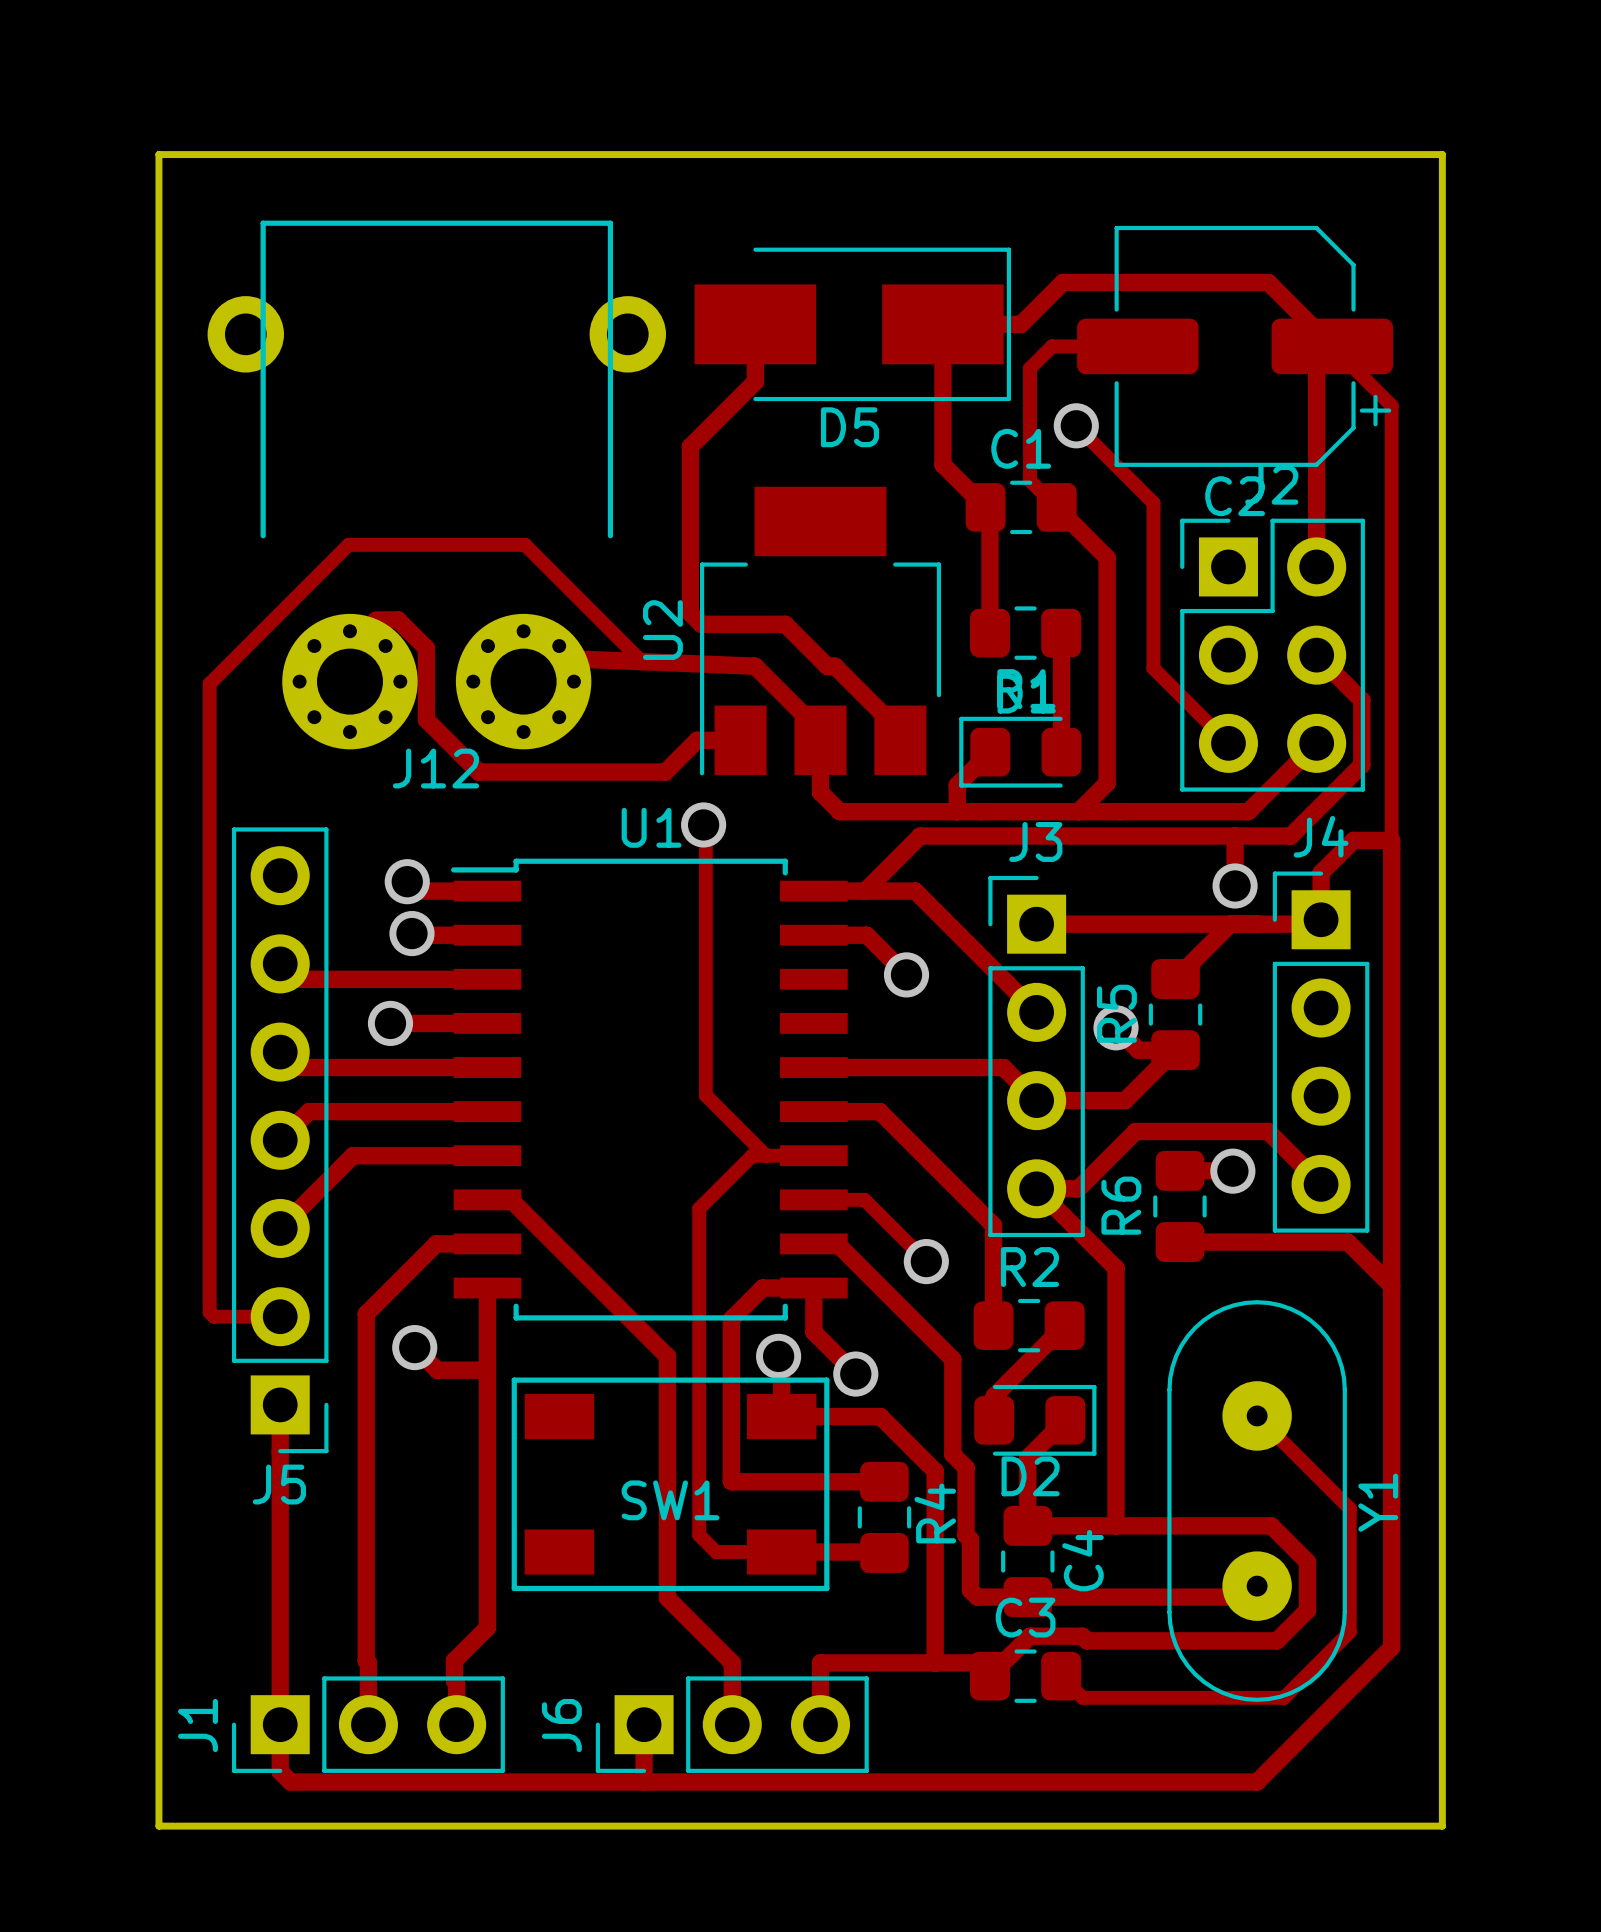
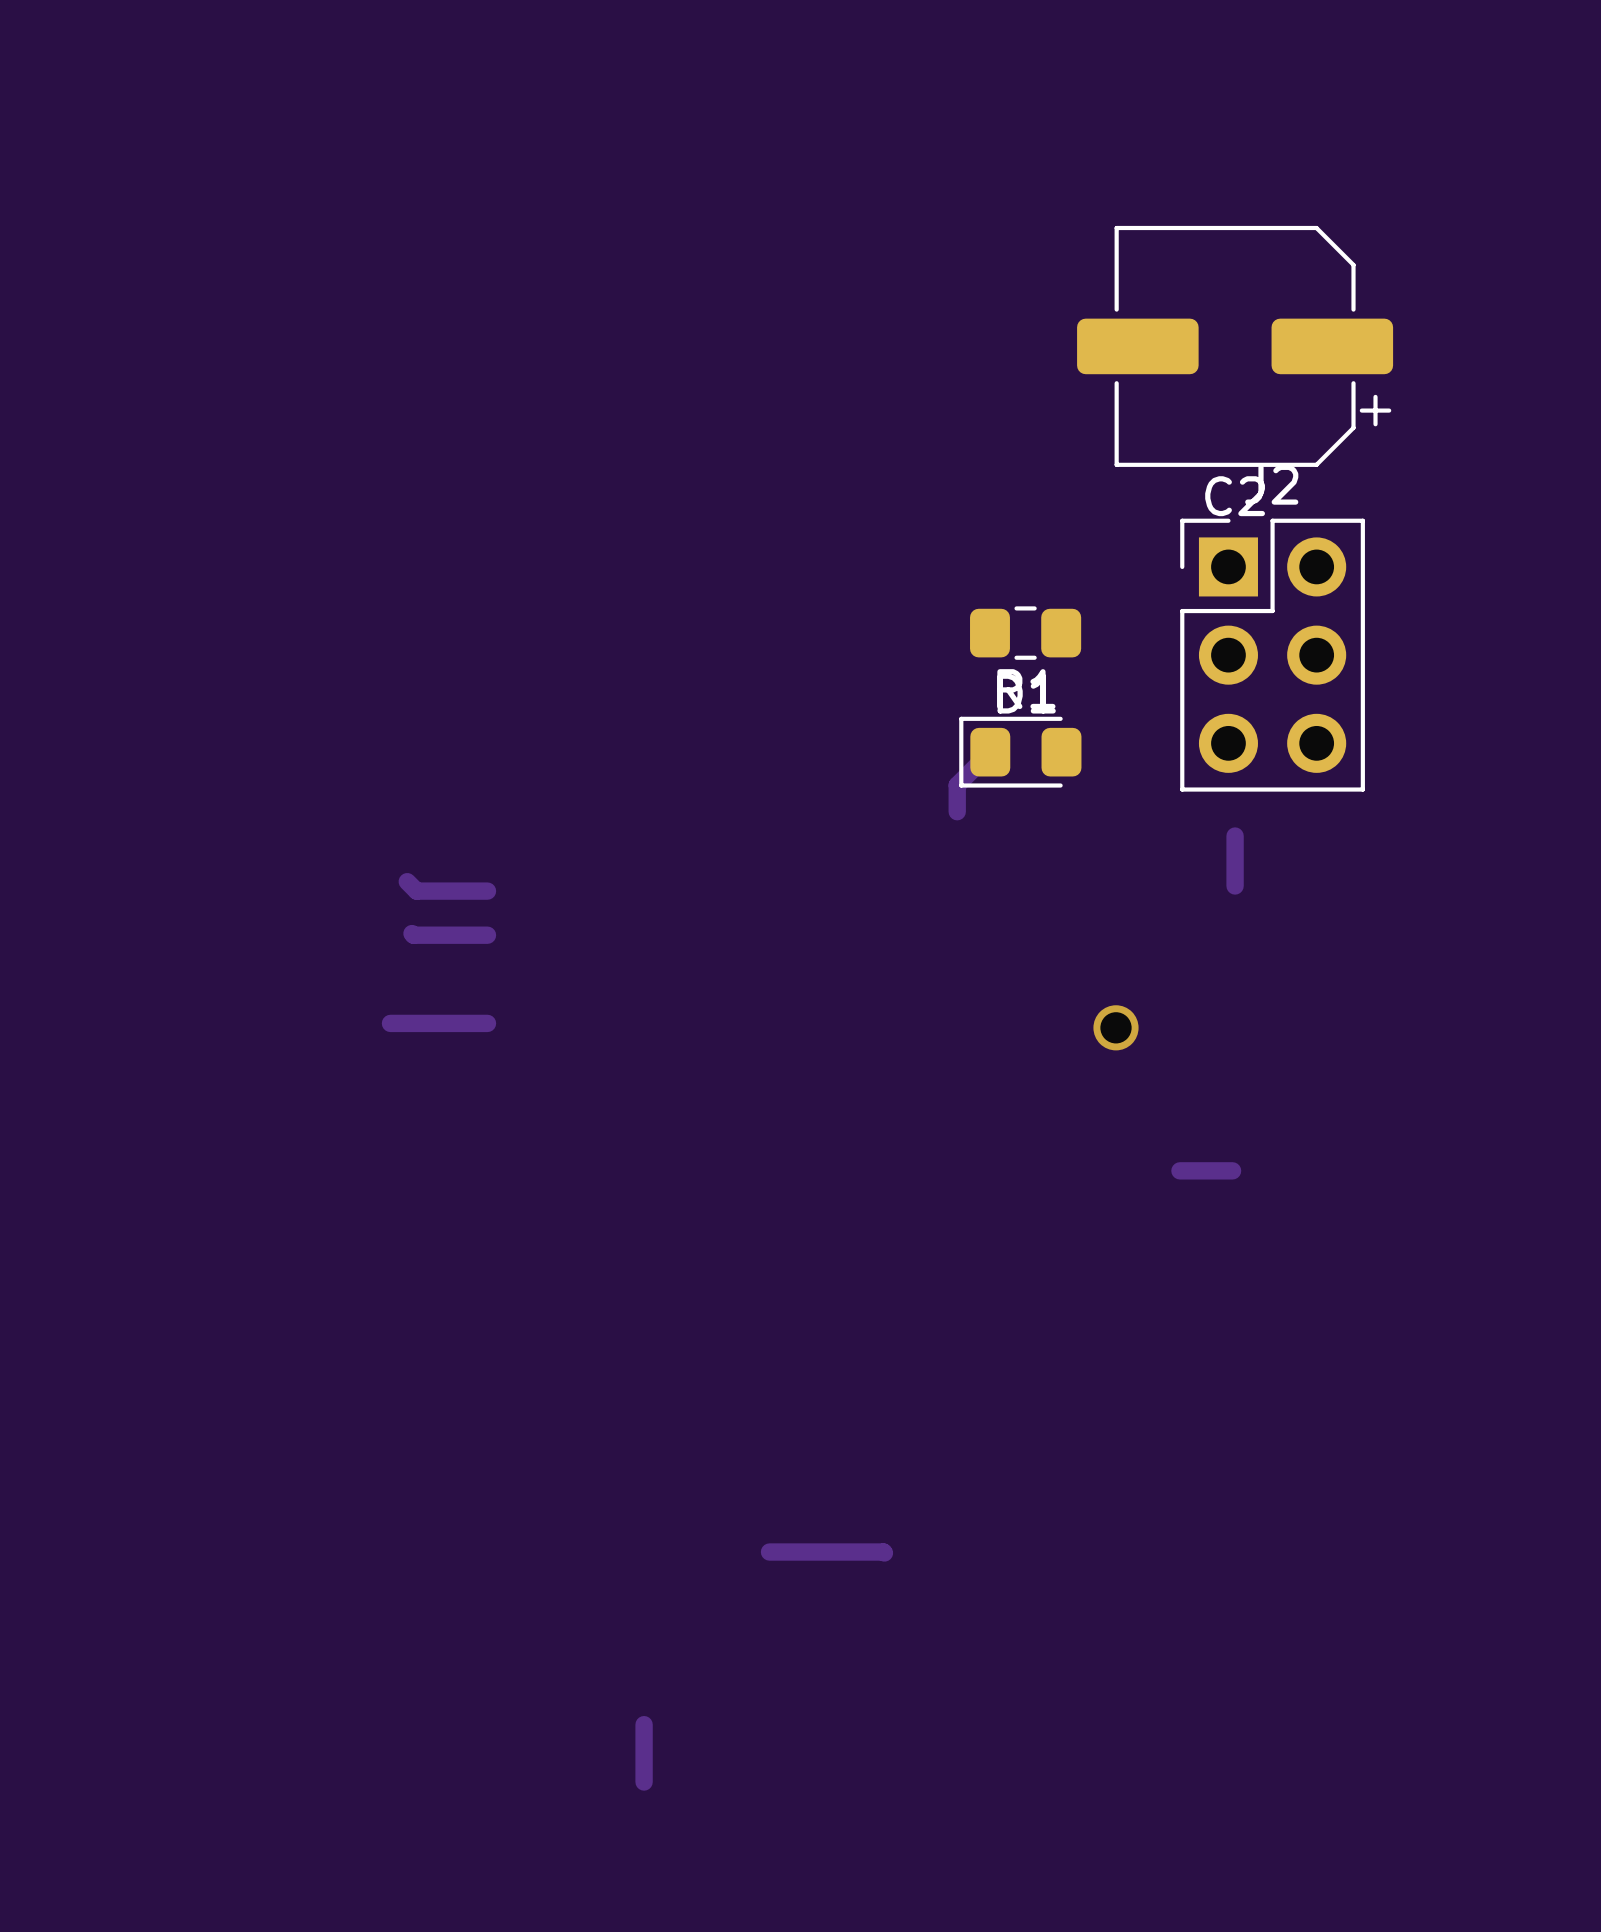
track: (755, 324) (755, 381) (690, 446) (690, 613) (701, 624) (785, 624) (827, 666) (834, 666) (900, 731) (900, 740) -> none
D5: (852, 324) -> none
track: (1137, 346) (1052, 346) (1029, 368) (1029, 480) (1107, 557) (1107, 783) (1078, 811) -> none
track: (1332, 346) (1268, 282) (1062, 282) (1021, 324) (942, 324) (942, 464) (989, 511) (989, 633) -> none
track: (1332, 346) (1316, 362) (1316, 566) -> none
track: (1332, 346) (1391, 405) (1391, 849) -> none
track: (1076, 425) (1153, 502) (1153, 668) (1228, 743) -> none
via: (1076, 425) -> none
J12: (436, 484) -> none
C1: (1021, 507) -> none
track: (376, 619) (398, 619) (426, 648) (426, 719) (478, 772) (665, 772) (697, 740) (740, 740) -> none
U2: (820, 631) -> none
track: (1061, 633) (1061, 752) -> none
track: (1316, 655) (1361, 700) (1361, 765) (1290, 836) (920, 836) (865, 891) -> none
track: (641, 661) (525, 544) (348, 544) (209, 683) (209, 1312) (214, 1316) (280, 1316) (280, 1307) -> none
track: (523, 681) (533, 672) (546, 672) (533, 657) (755, 666) (820, 731) (820, 792) (839, 811) (1248, 811) (1316, 743) -> none
track: (703, 824) (705, 827) (705, 1095) (766, 1155) -> none
via: (703, 824) -> none
via: (407, 881) -> none
via: (1235, 885) -> none
track: (813, 891) (915, 891) (1036, 1012) -> none
track: (1036, 924) (1316, 924) (1321, 919) (1321, 872) (1353, 840) (1391, 840) (1391, 1647) (1257, 1782) (290, 1782) (280, 1771) (280, 1404) -> none
track: (1230, 924) (1175, 979) -> none
via: (411, 933) -> none
track: (813, 935) (866, 935) (906, 974) -> none
track: (280, 963) (295, 979) (487, 979) -> none
via: (906, 974) -> none
R5: (1175, 1014) -> none
via: (390, 1023) -> none
track: (1116, 1027) (1138, 1050) (1175, 1050) (1125, 1100) (1036, 1100) (1003, 1067) (813, 1067) -> none
track: (280, 1052) (295, 1067) (487, 1067) -> none
J4: (1321, 1052) -> none
J3: (1036, 1056) -> none
U1: (649, 1089) -> none
track: (487, 1111) (308, 1111) (280, 1140) -> none
track: (813, 1111) (879, 1111) (993, 1225) (993, 1325) -> none
J5: (280, 1140) -> none
track: (487, 1155) (353, 1155) (280, 1228) -> none
track: (813, 1155) (752, 1155) (699, 1208) (699, 1535) (716, 1552) (781, 1552) -> none
via: (1232, 1171) -> none
track: (1321, 1184) (1268, 1131) (1135, 1131) (1078, 1188) (1036, 1188) (1116, 1268) (1116, 1525) -> none
track: (487, 1199) (510, 1199) (667, 1356) (667, 1598) (732, 1662) (732, 1724) -> none
track: (813, 1199) (864, 1199) (926, 1261) -> none
R6: (1179, 1206) -> none
track: (1179, 1242) (1347, 1242) (1391, 1285) -> none
track: (487, 1243) (436, 1243) (366, 1313) (366, 1660) (368, 1662) (368, 1724) -> none
track: (790, 1243) (837, 1243) (952, 1359) (952, 1454) (966, 1467) (966, 1535) (970, 1539) (970, 1590) (977, 1597) (1246, 1597) (1257, 1586) -> none
via: (926, 1261) -> none
track: (487, 1288) (487, 1627) (454, 1660) (456, 1724) -> none
R2: (1029, 1325) -> none
track: (1064, 1325) (994, 1396) (994, 1420) -> none
track: (414, 1347) (437, 1370) (482, 1370) (487, 1365) -> none
via: (414, 1347) -> none
track: (778, 1356) (781, 1359) (781, 1416) (880, 1416) (935, 1471) (935, 1662) -> none
via: (778, 1356) -> none
track: (855, 1374) (813, 1332) (813, 1288) (762, 1288) (731, 1319) (731, 1481) (884, 1481) -> none
via: (855, 1374) -> none
track: (1257, 1415) (1349, 1508) (1349, 1632) (1284, 1697) (1082, 1697) (1061, 1676) -> none
D2: (1035, 1420) -> none
track: (1065, 1420) (1027, 1457) (1027, 1525) (1271, 1525) (1307, 1561) (1307, 1610) (1276, 1640) (1087, 1640) (1082, 1636) (1029, 1636) (989, 1676) (976, 1662) (820, 1662) (820, 1724) -> none
SW1: (670, 1484) -> none
Y1: (1257, 1501) -> none
R4: (884, 1517) -> none
C4: (1027, 1561) -> none
C3: (1025, 1676) -> none
J1: (368, 1724) -> none
J6: (732, 1724) -> none
board edge: (174, 1826) (158, 1826) (158, 154) (1442, 154) (1442, 1826) (176, 1826) -> none

